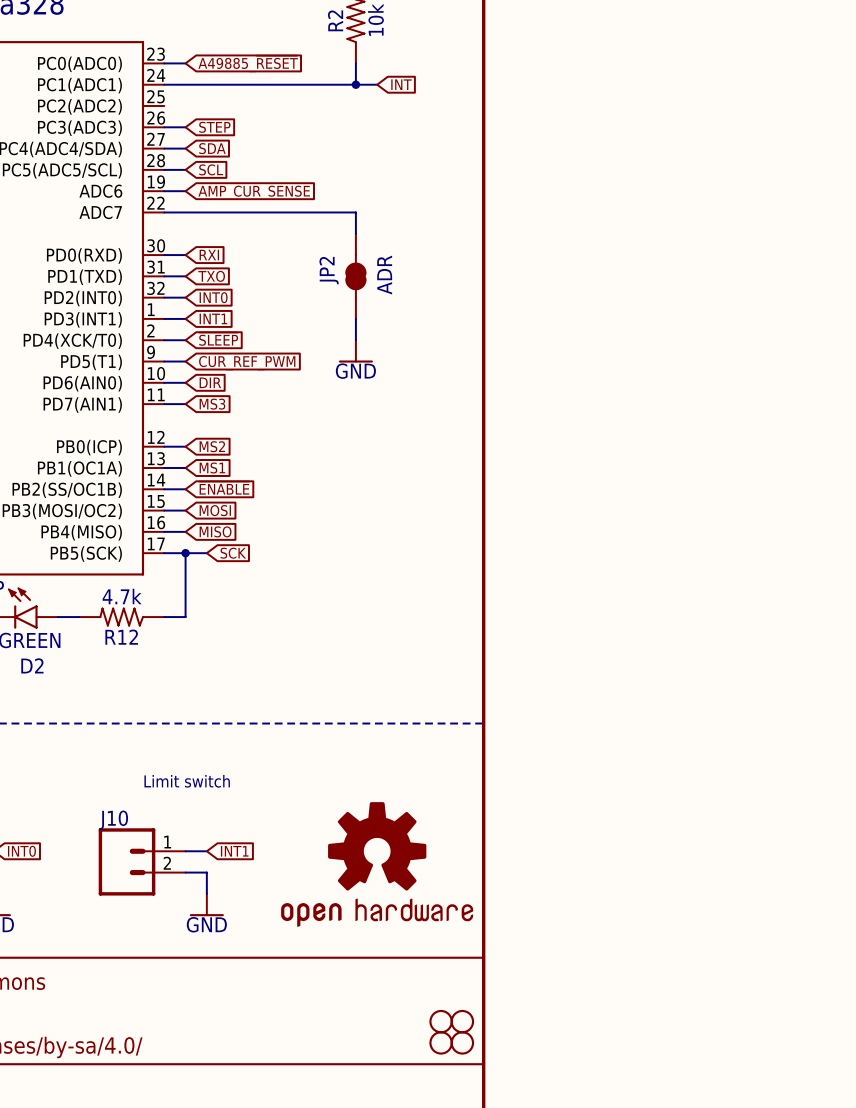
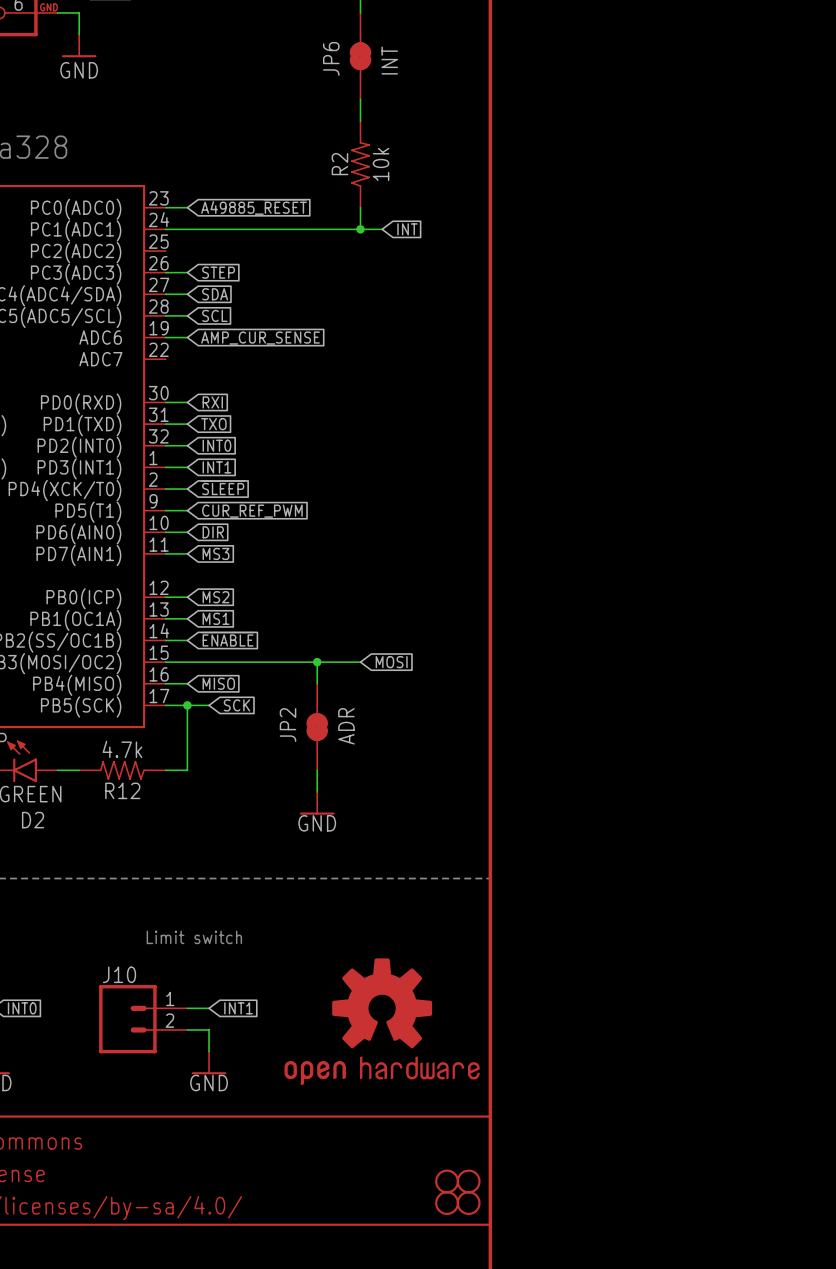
wire: (164, 212) (355, 212) (355, 233) -> none
JP2 position: (355, 276) -> (317, 727)
wire: (355, 318) (355, 340) -> (317, 662) (317, 683)
power symbol: GND (355, 351) -> none
wire: none -> (187, 662) (360, 662)
global label position: MOSI (215, 510) -> MOSI (391, 662)
junction: none -> (317, 662)
wire: none -> (317, 770) (317, 791)
power symbol: none -> GND (317, 803)

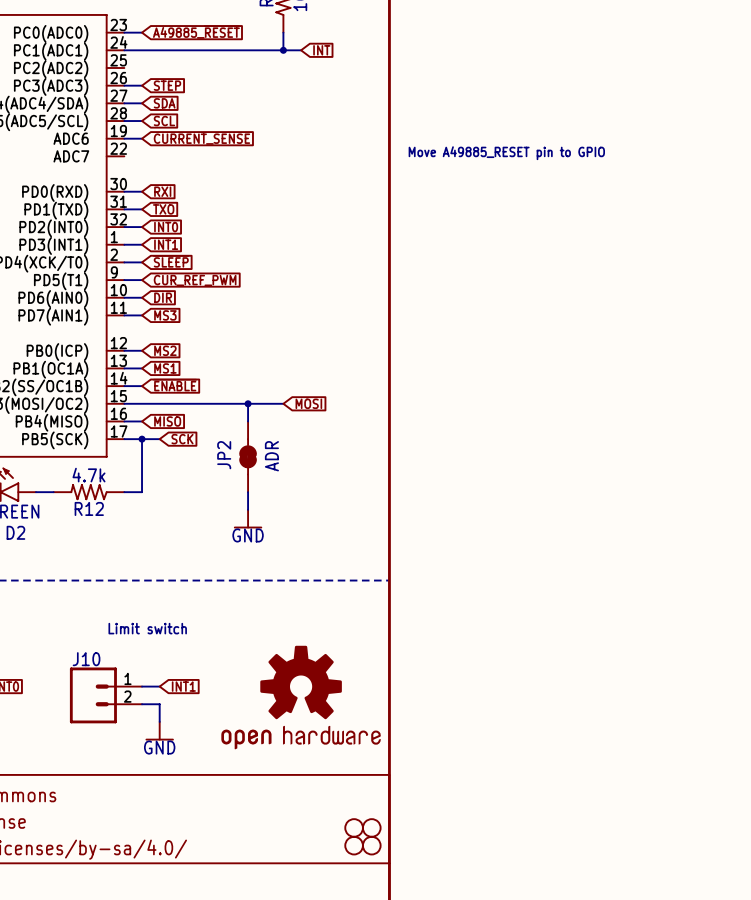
global label: AMP_CUR_SENSE (260, 338) -> CURRENT_SENSE (201, 139)
text: none -> Move A49885_RESET pin to GPIO (506, 153)

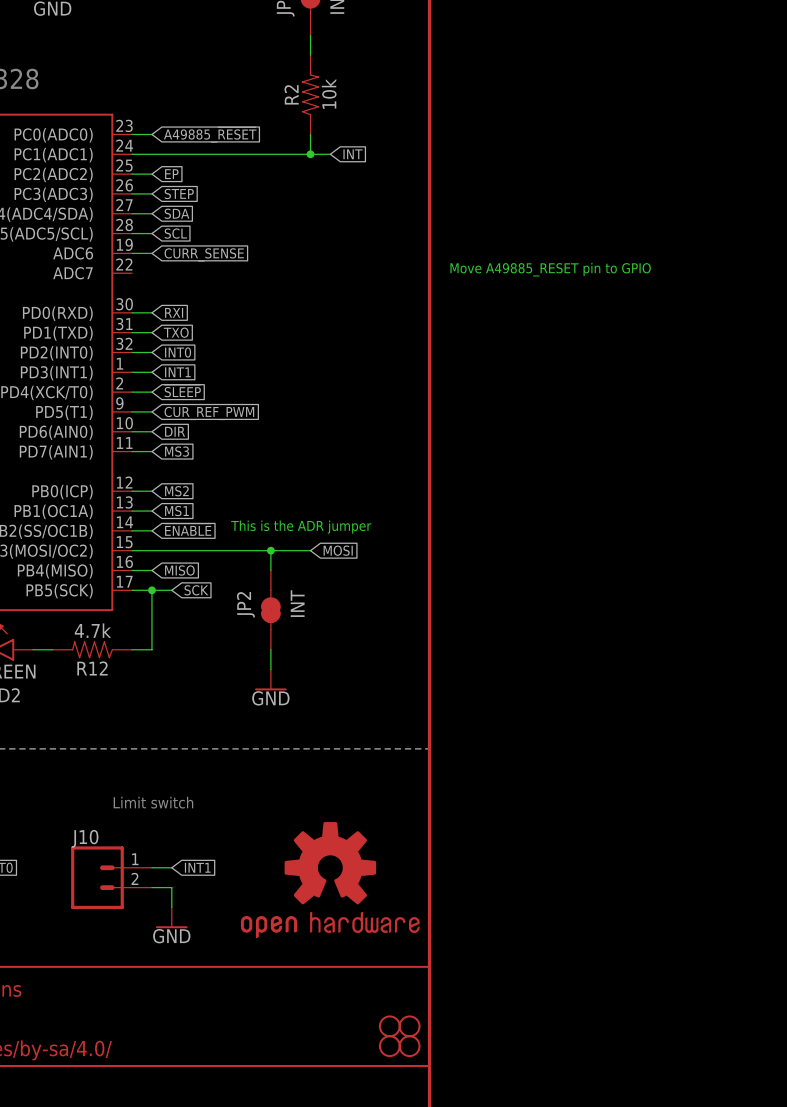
wire: none -> (132, 174) (151, 174)
global label: none -> EP (171, 174)
global label: CURRENT_SENSE (201, 139) -> CURR_SENSE (204, 254)
text: none -> This is the ADR jumper (301, 527)
JP2 value: ADR (271, 456) -> INT (297, 603)

